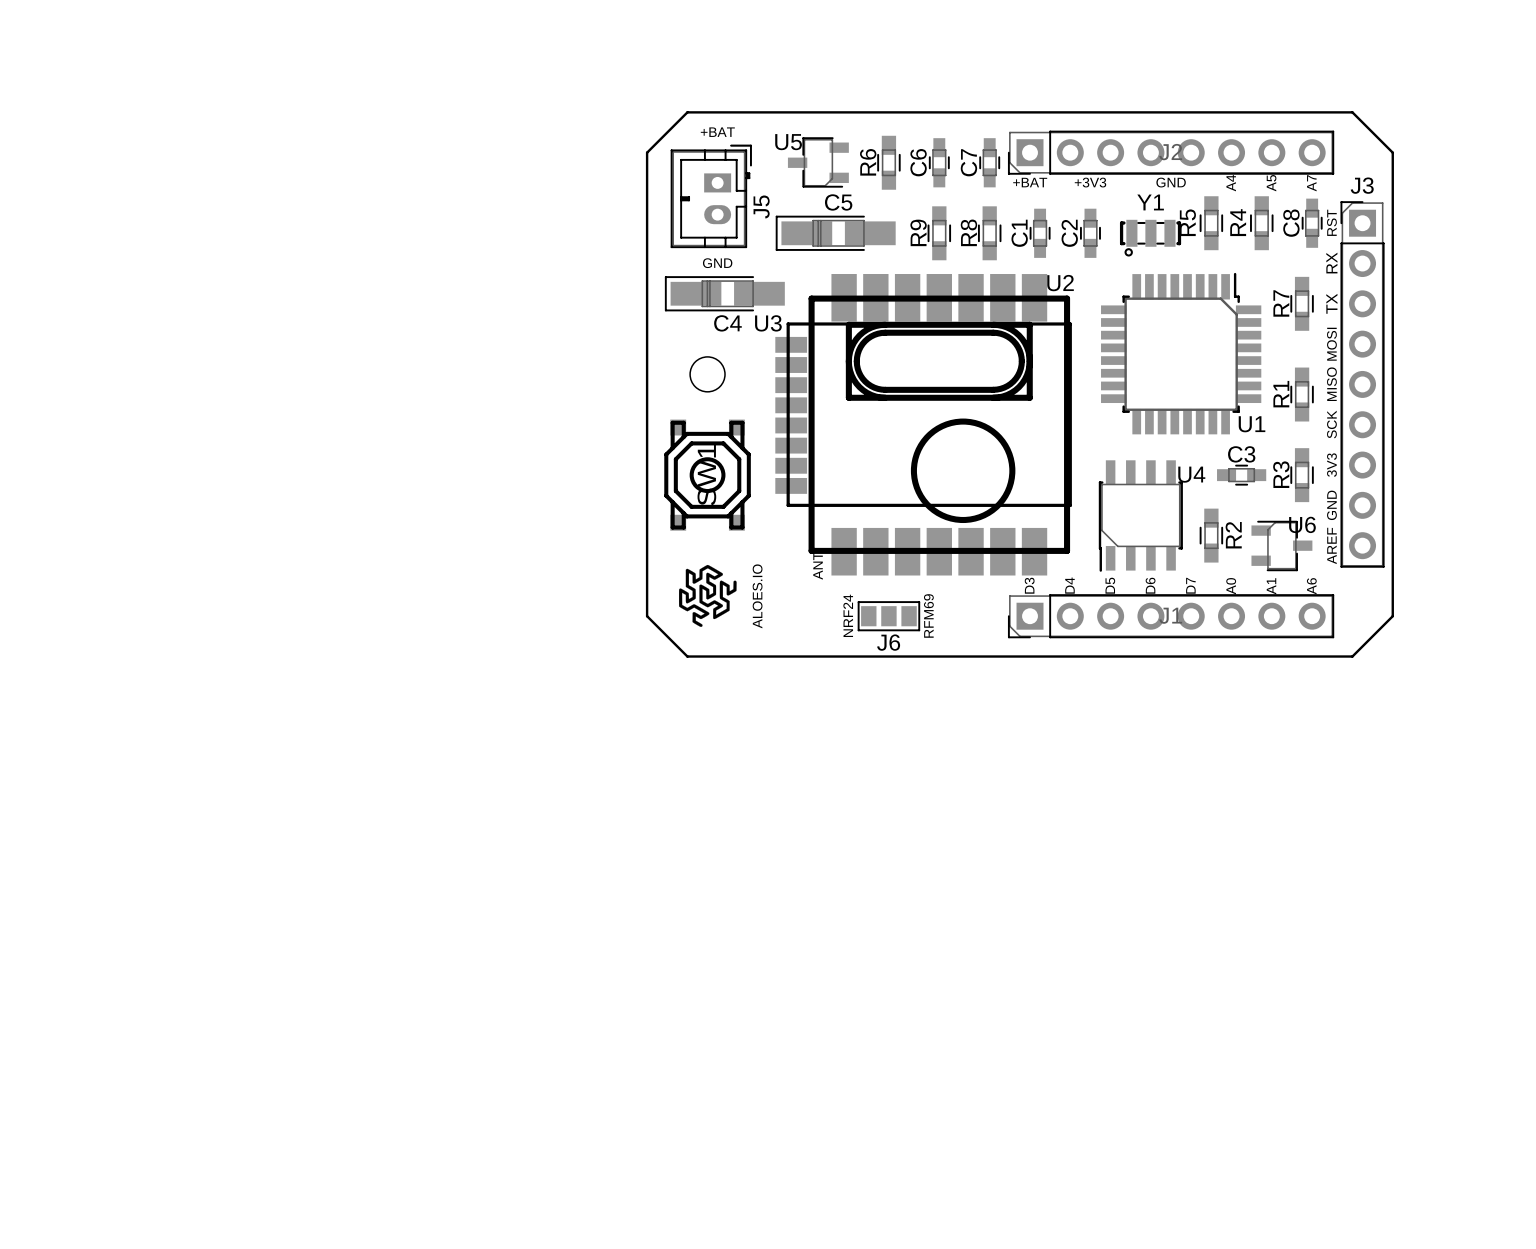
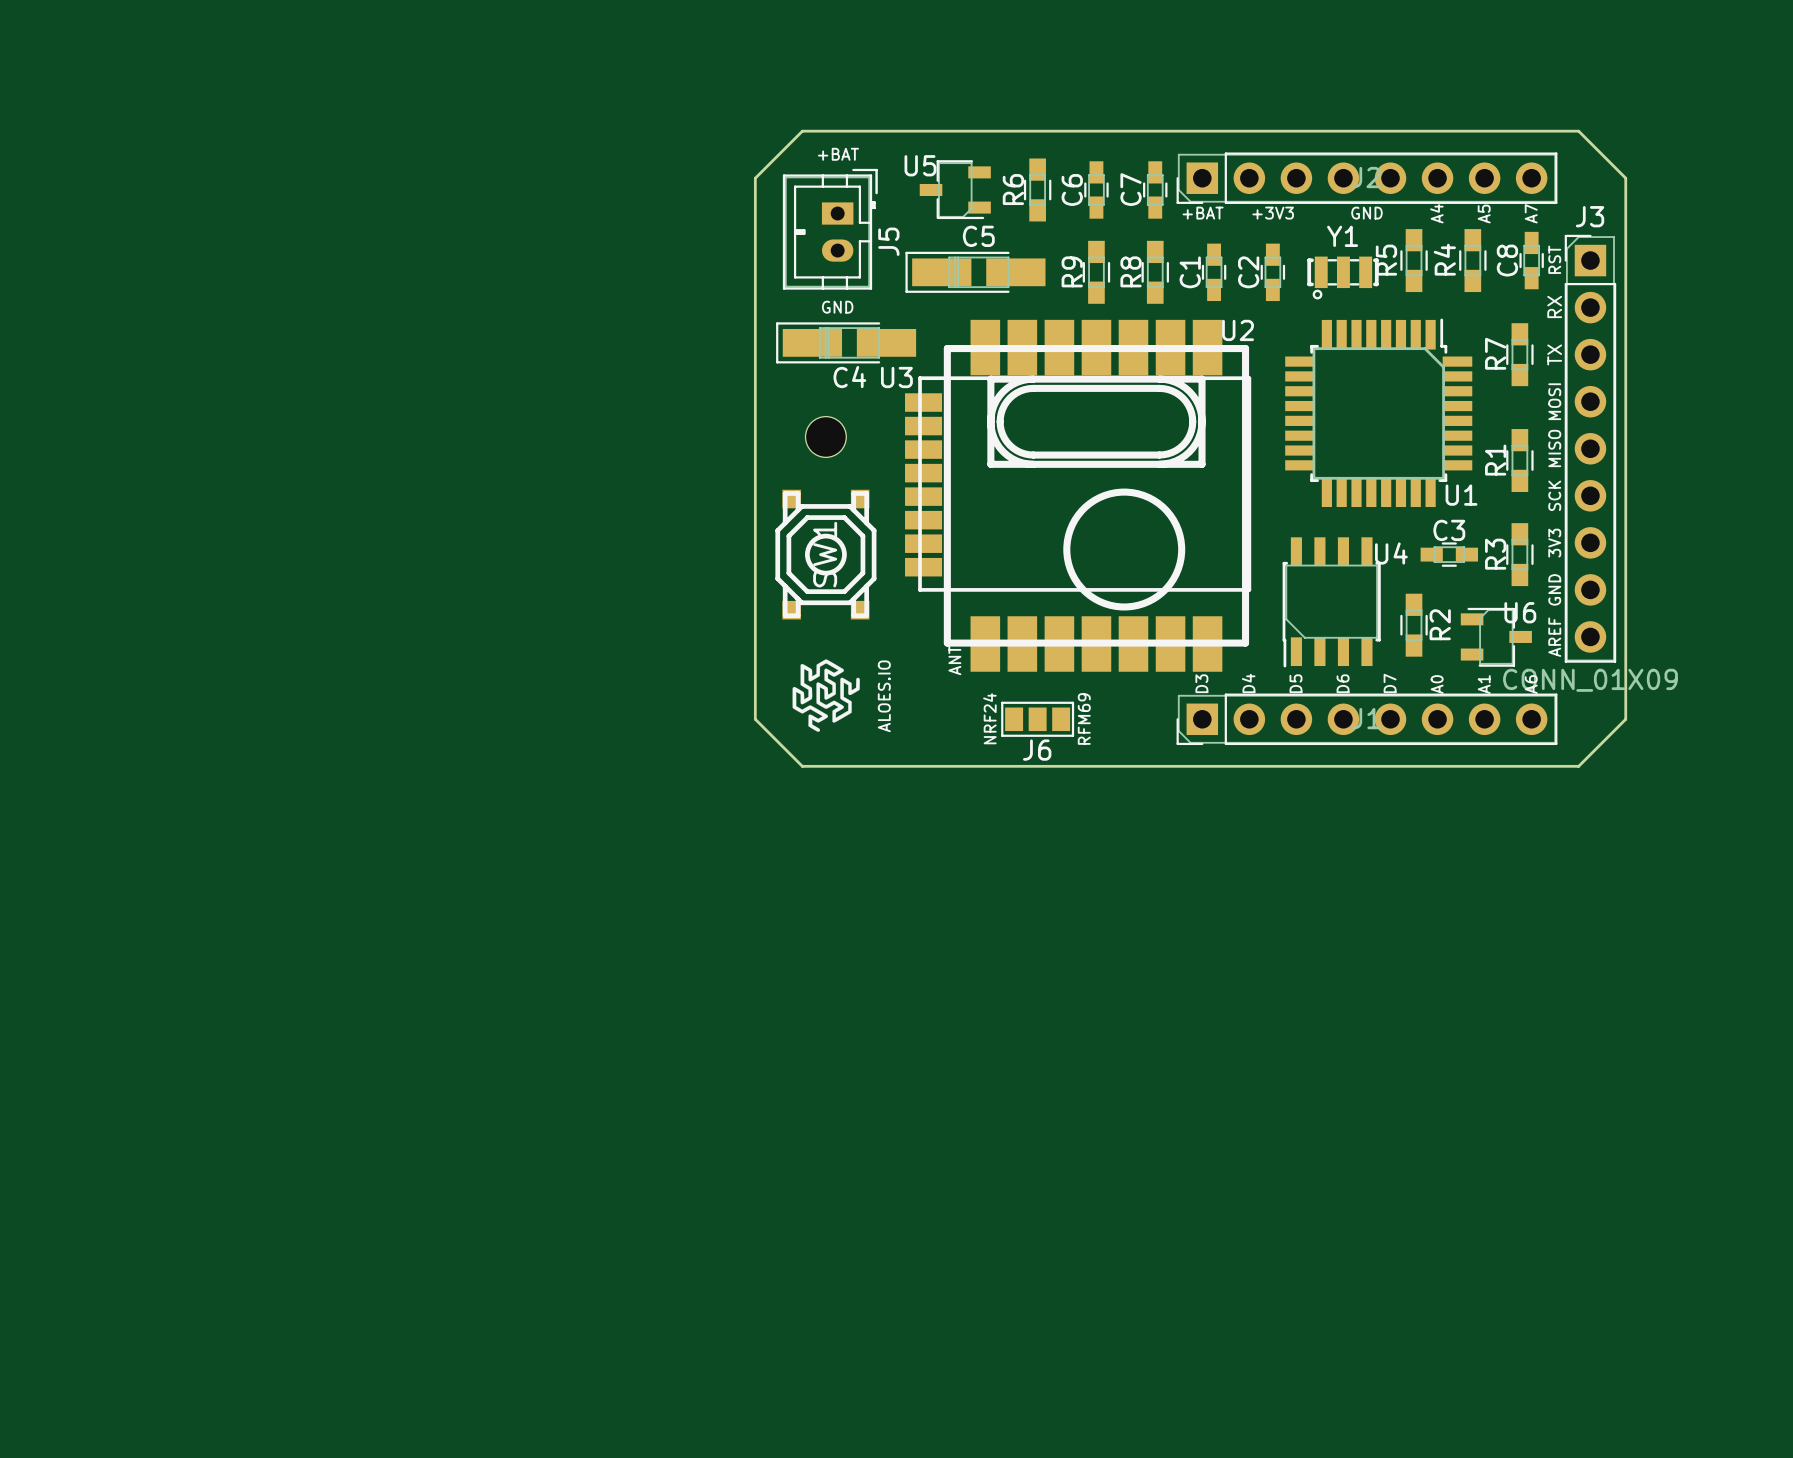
J3 value: none -> CONN_01X09 (1590, 680)

